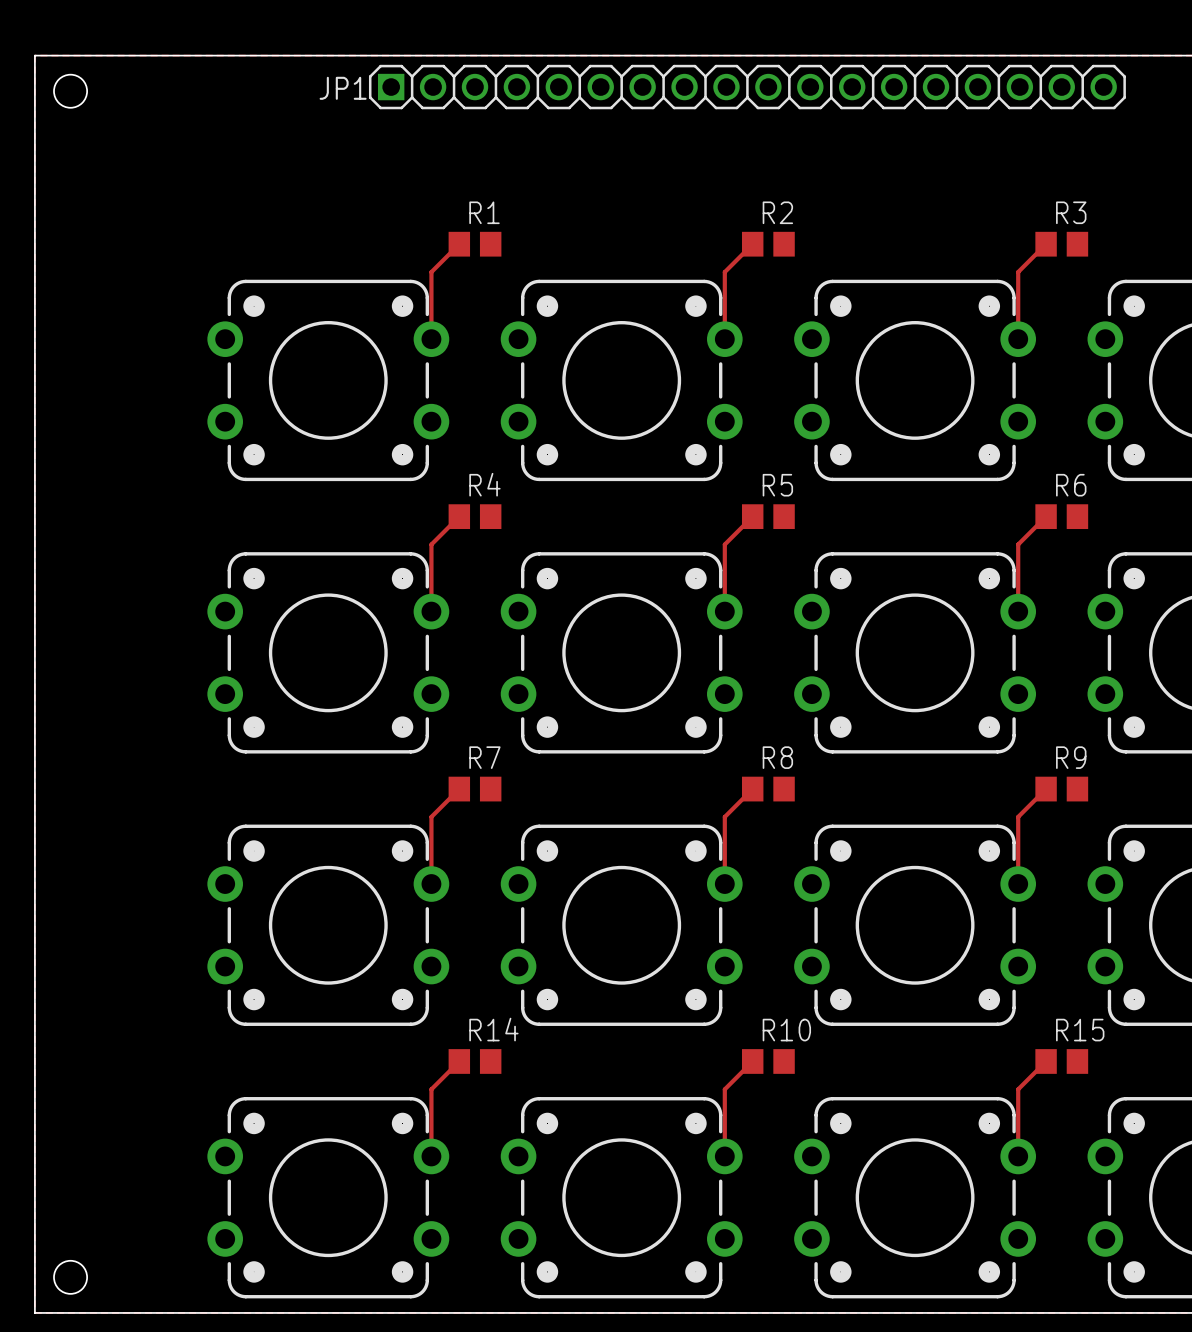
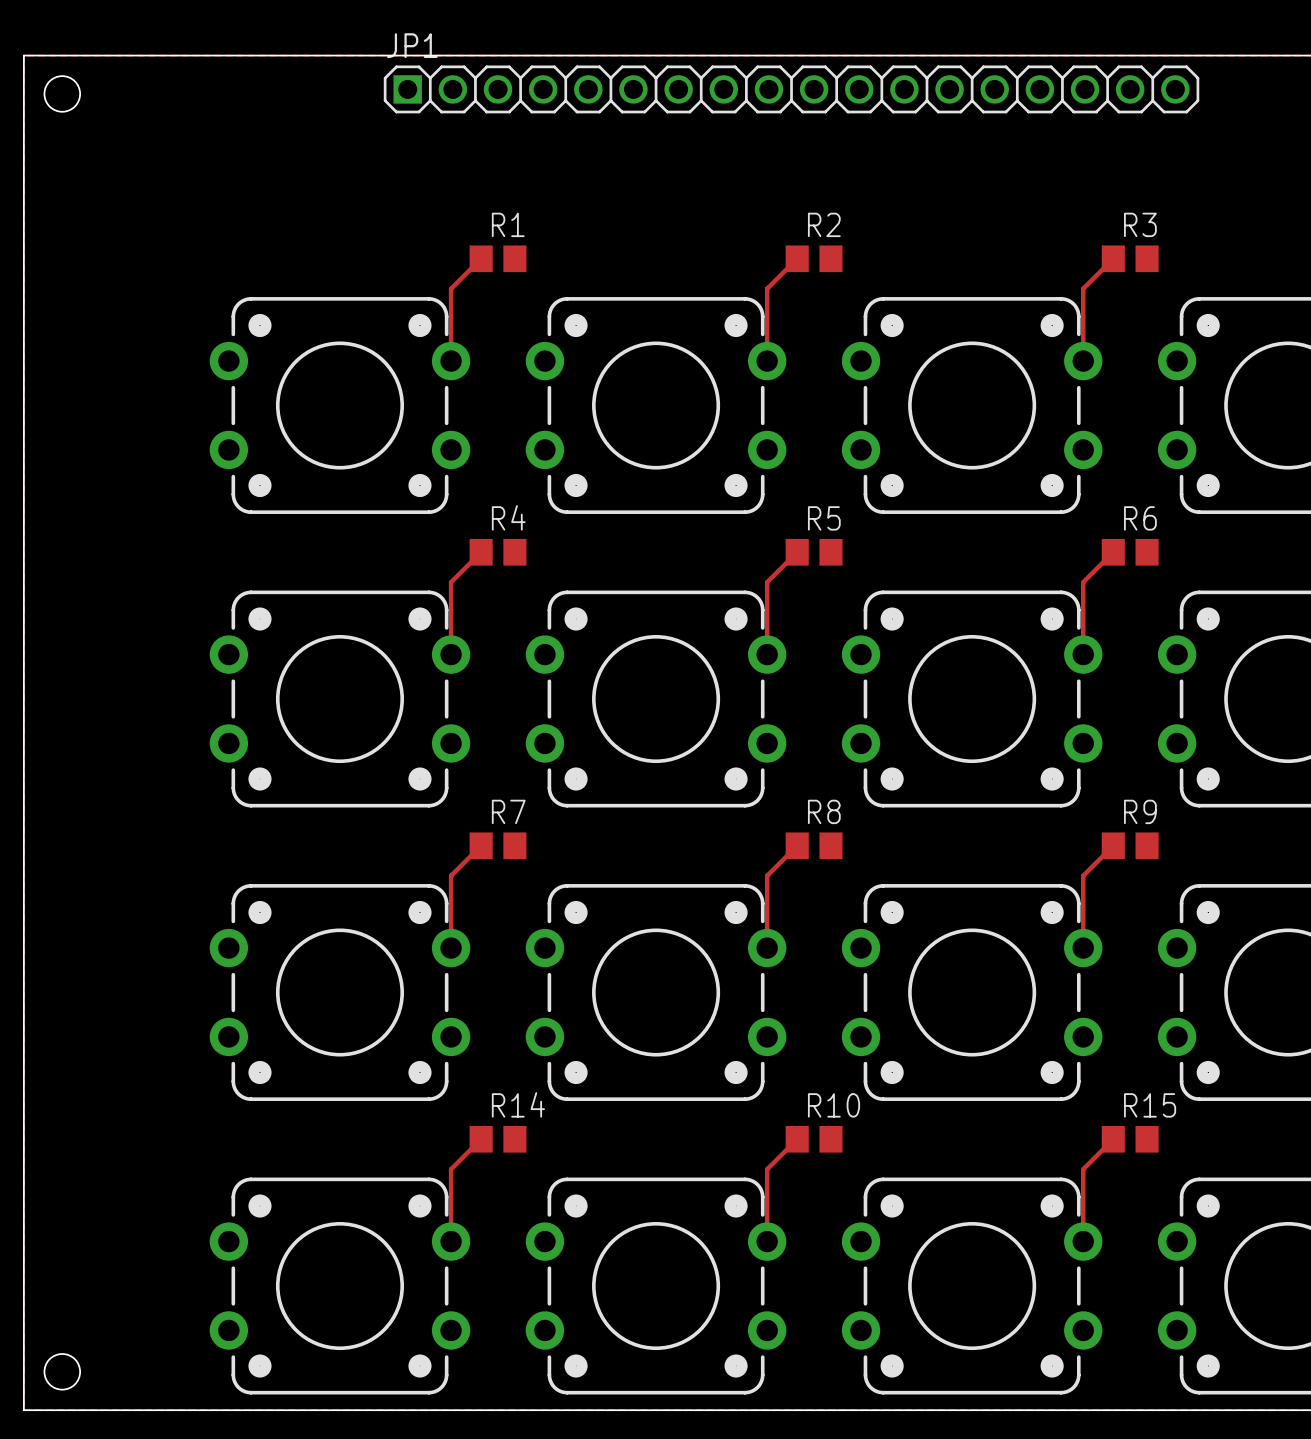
JP1 name position: JP1 (343, 88) -> JP1 (412, 45)

